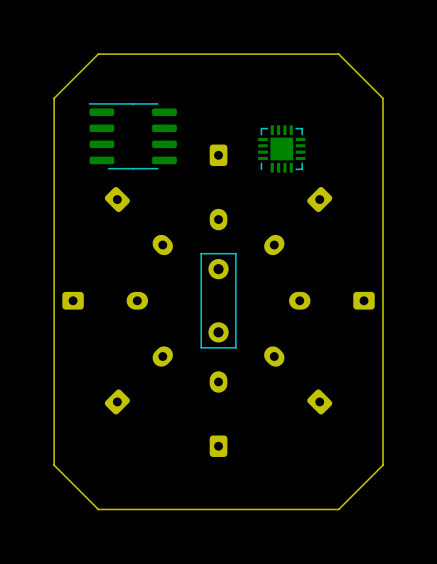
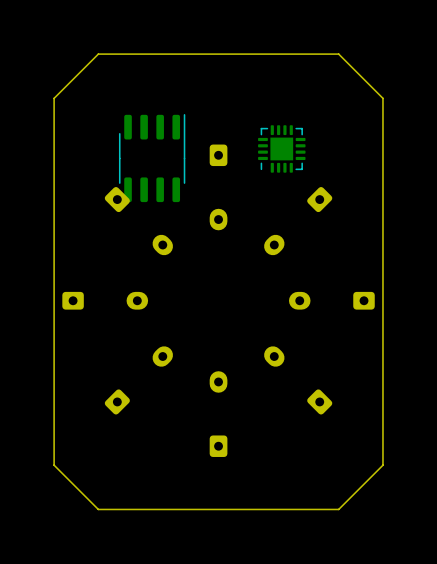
part rotation: 0° (132, 136) -> 90° clockwise (152, 158)
part: (218, 300) -> none

